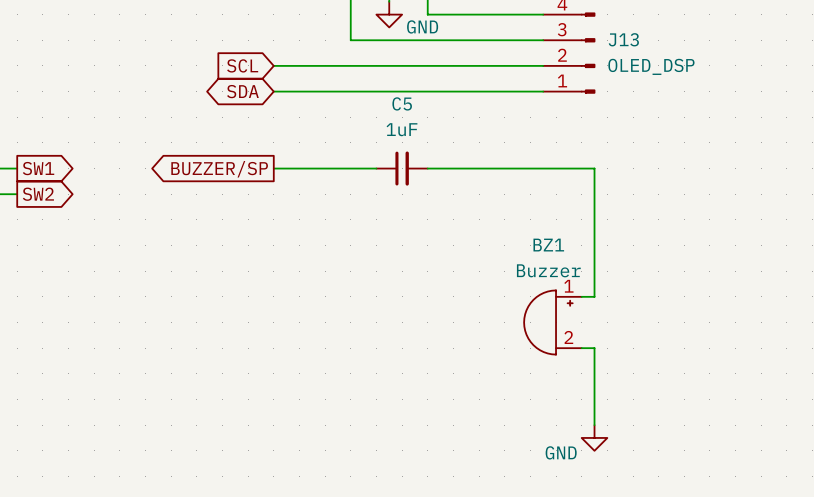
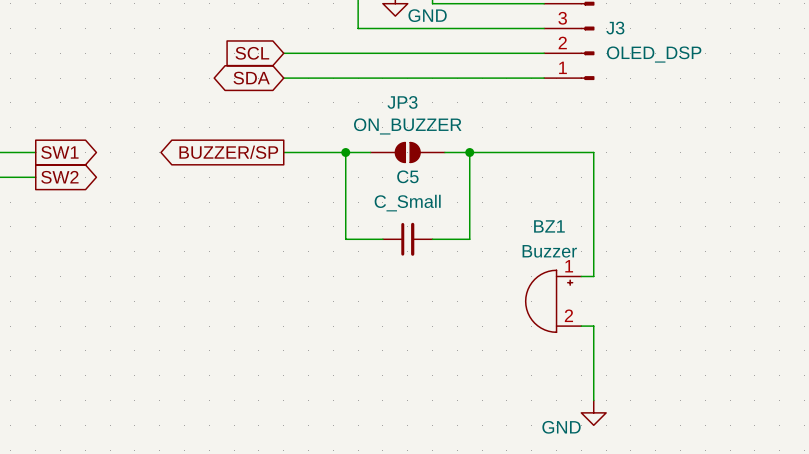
J13 name: J13 (623, 39) -> J3 (615, 28)
C5 value: 1uF (401, 129) -> C_Small (407, 203)
wire: none -> (345, 152) (345, 239) (382, 239)
junction: none -> (345, 152)
C5 position: (402, 168) -> (407, 239)
JP3: none -> ON_BUZZER (407, 152)
wire: none -> (469, 152) (469, 239) (432, 239)
junction: none -> (469, 152)

